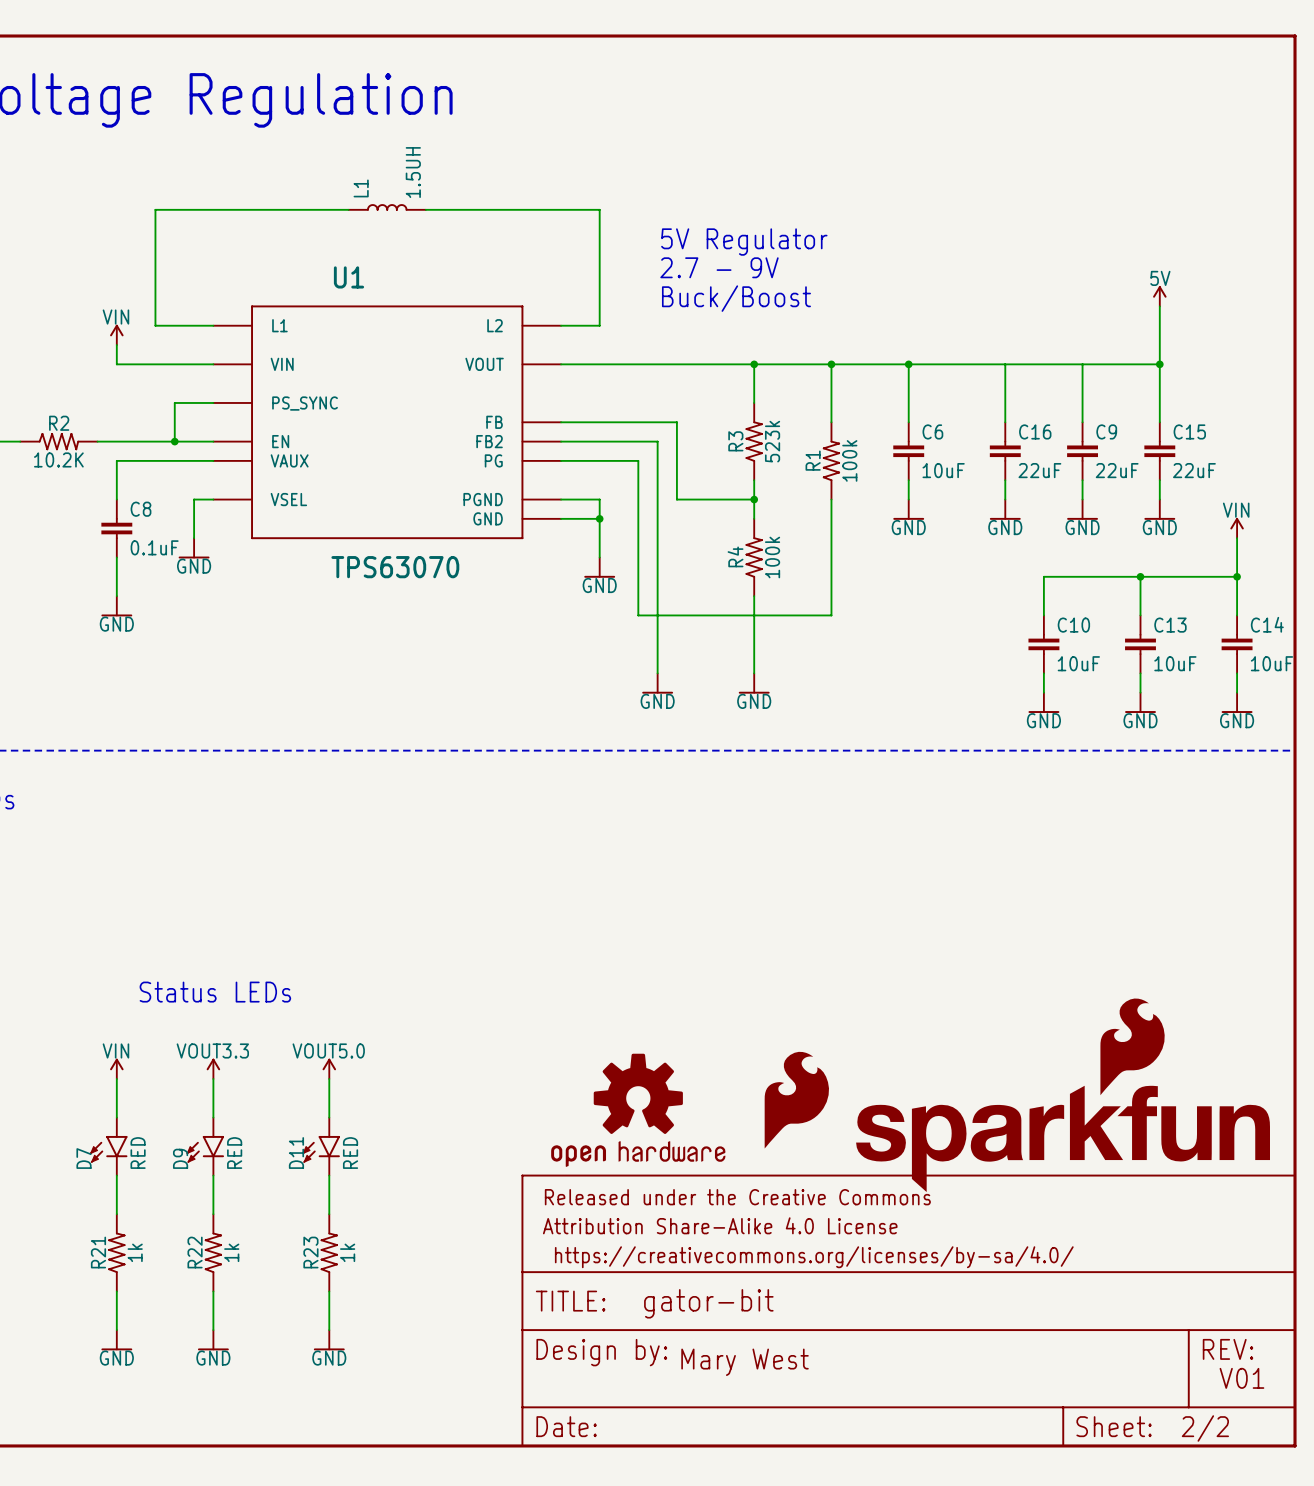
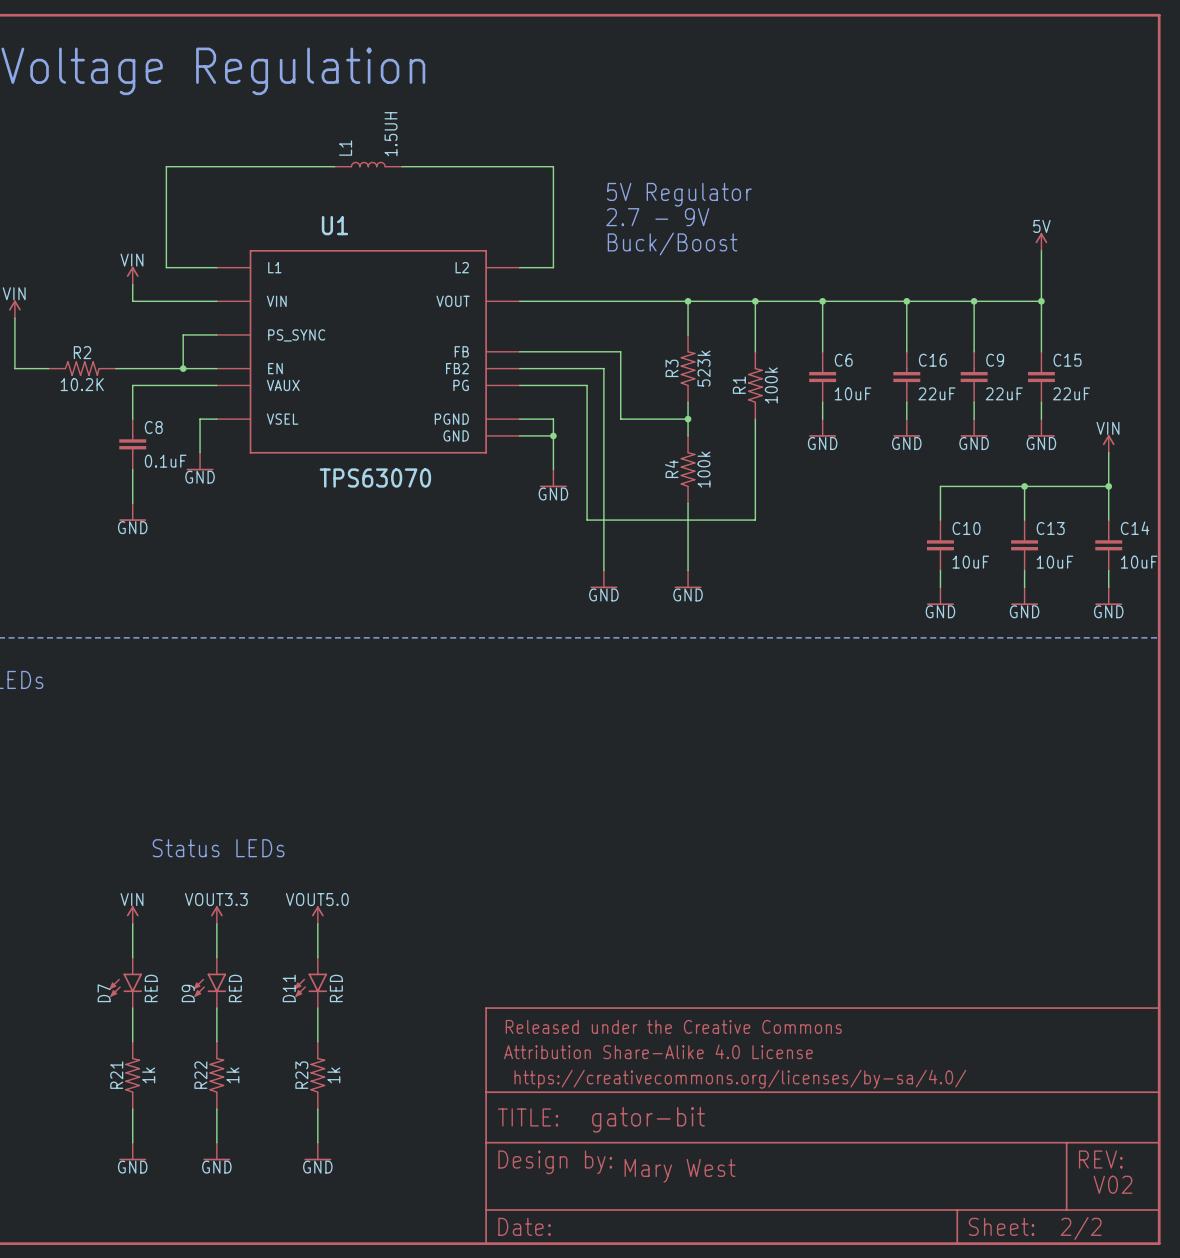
junction: none -> (906, 301)
junction: none -> (974, 301)
part: (1063, 1095) -> none
part: (796, 1100) -> none
part: (638, 1110) -> none
text: V01 (1241, 1378) -> V02 (1112, 1184)

